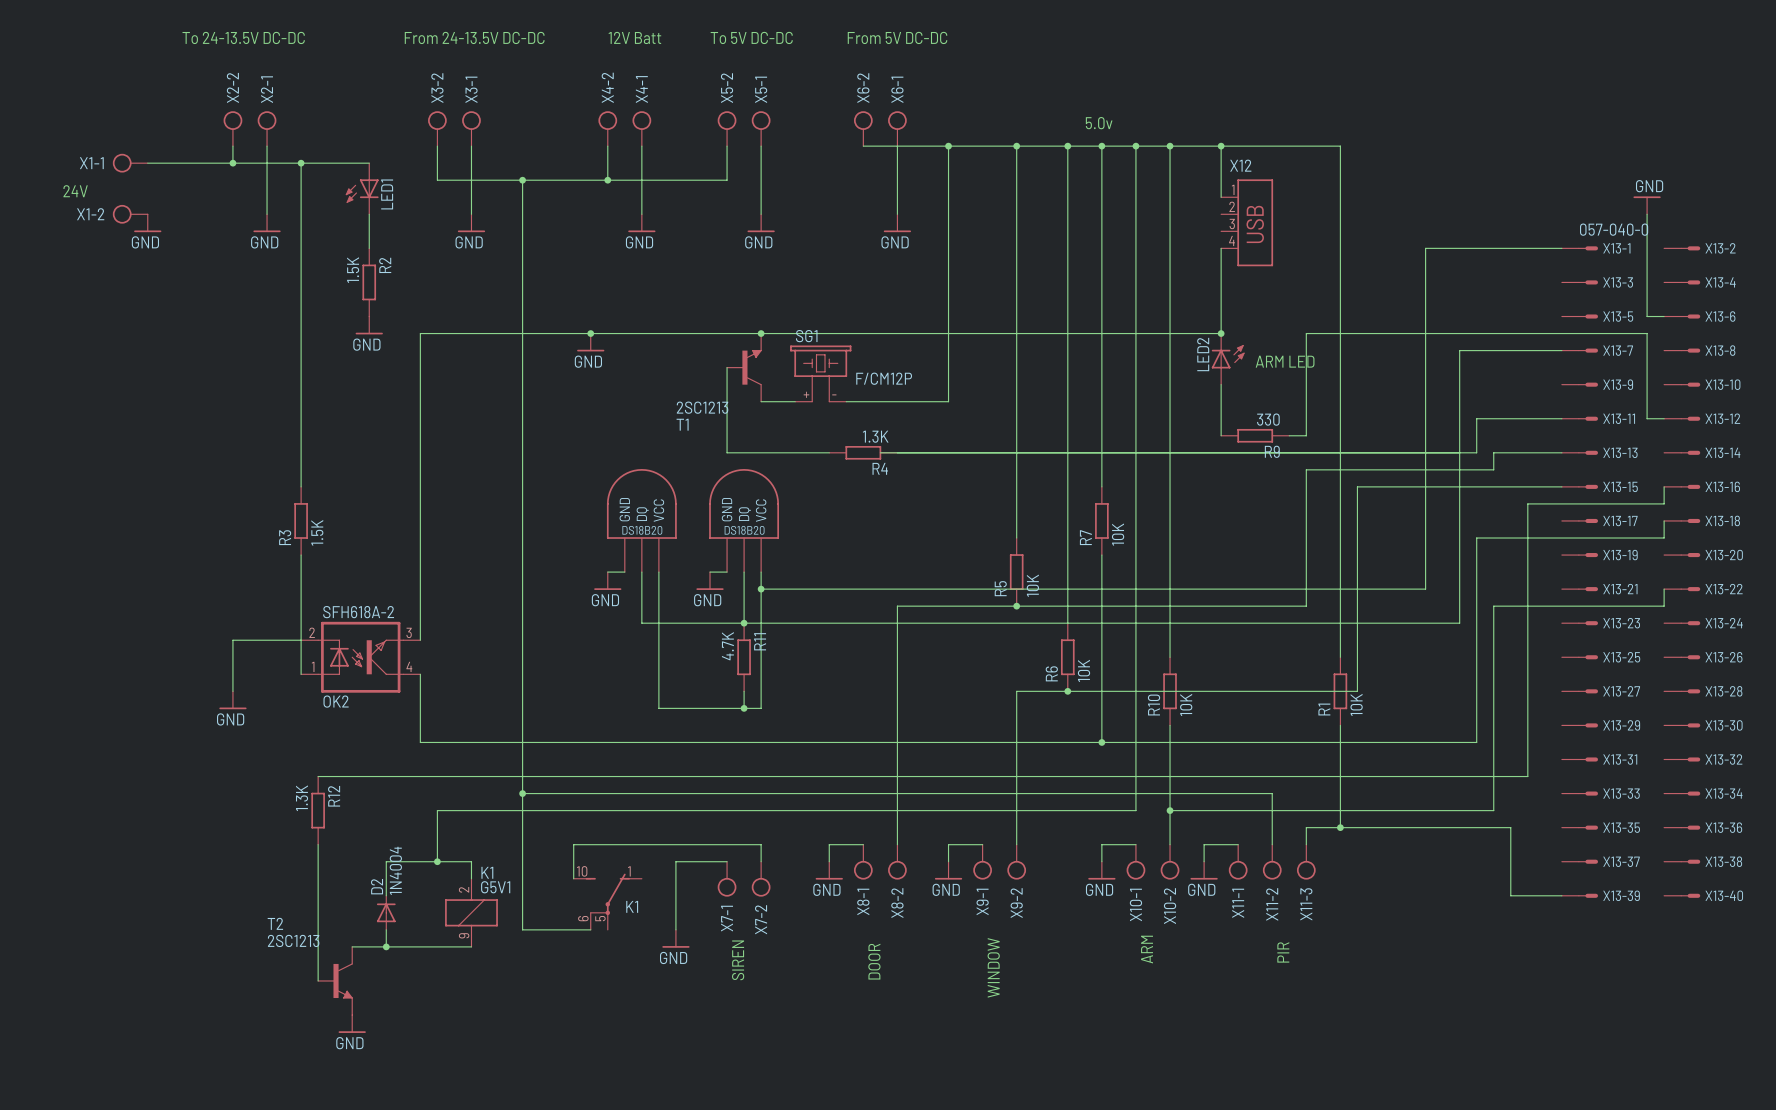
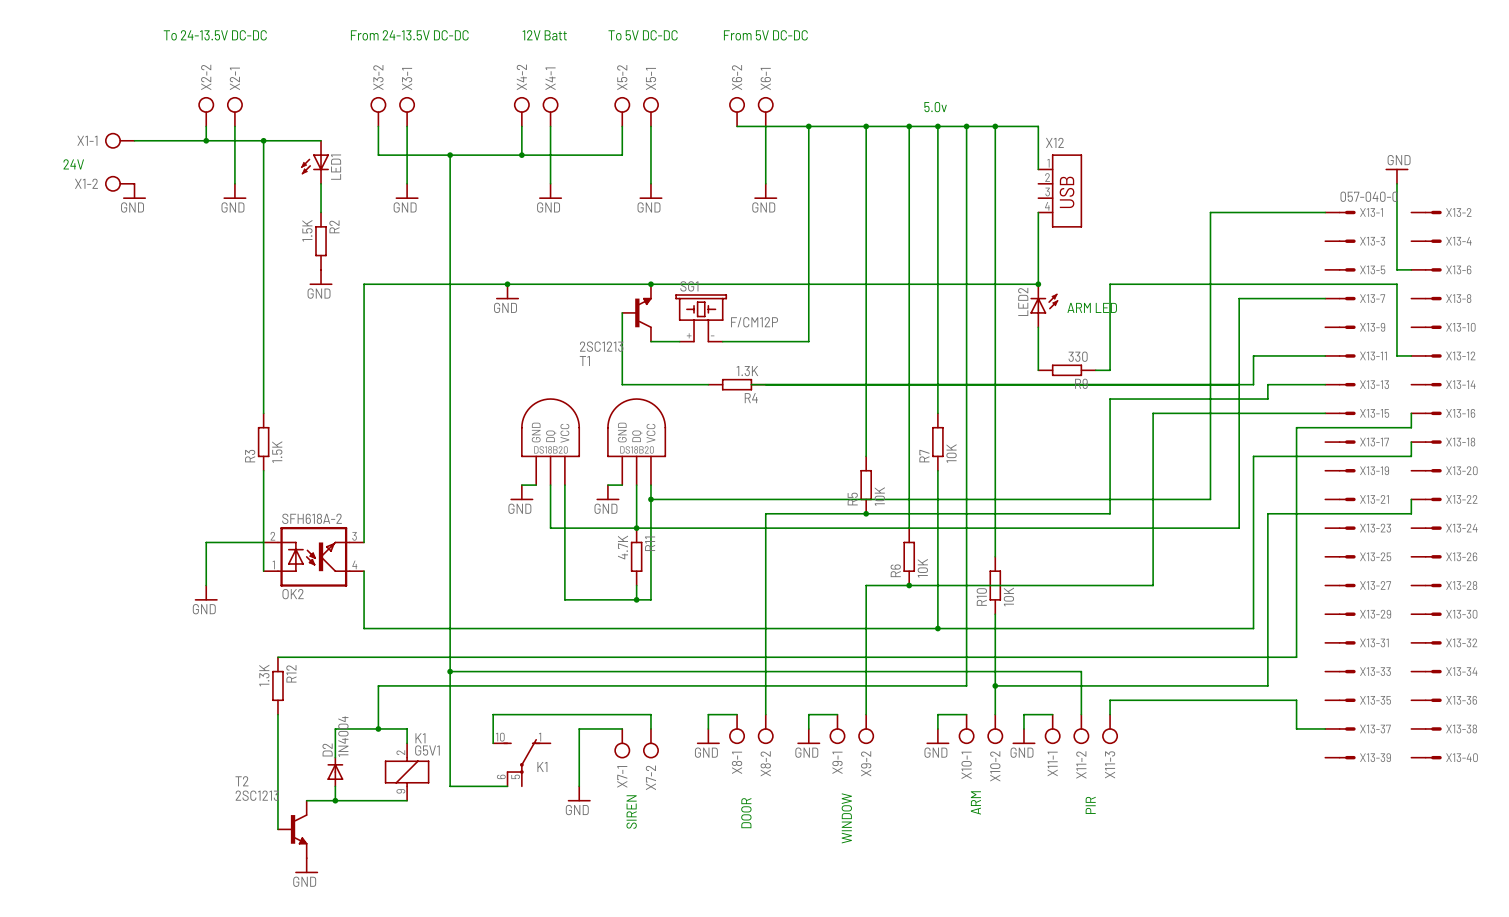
wire: (1221, 146) (1340, 146) (1340, 657) -> none
junction: (1221, 146) -> none
R1: 10K (1340, 691) -> none
wire: (1340, 725) (1340, 827) -> none
junction: (1340, 827) -> none
wire: (1510, 827) (1510, 895) (1561, 895) -> (1282, 700) (1296, 700) (1296, 728) (1325, 728)

